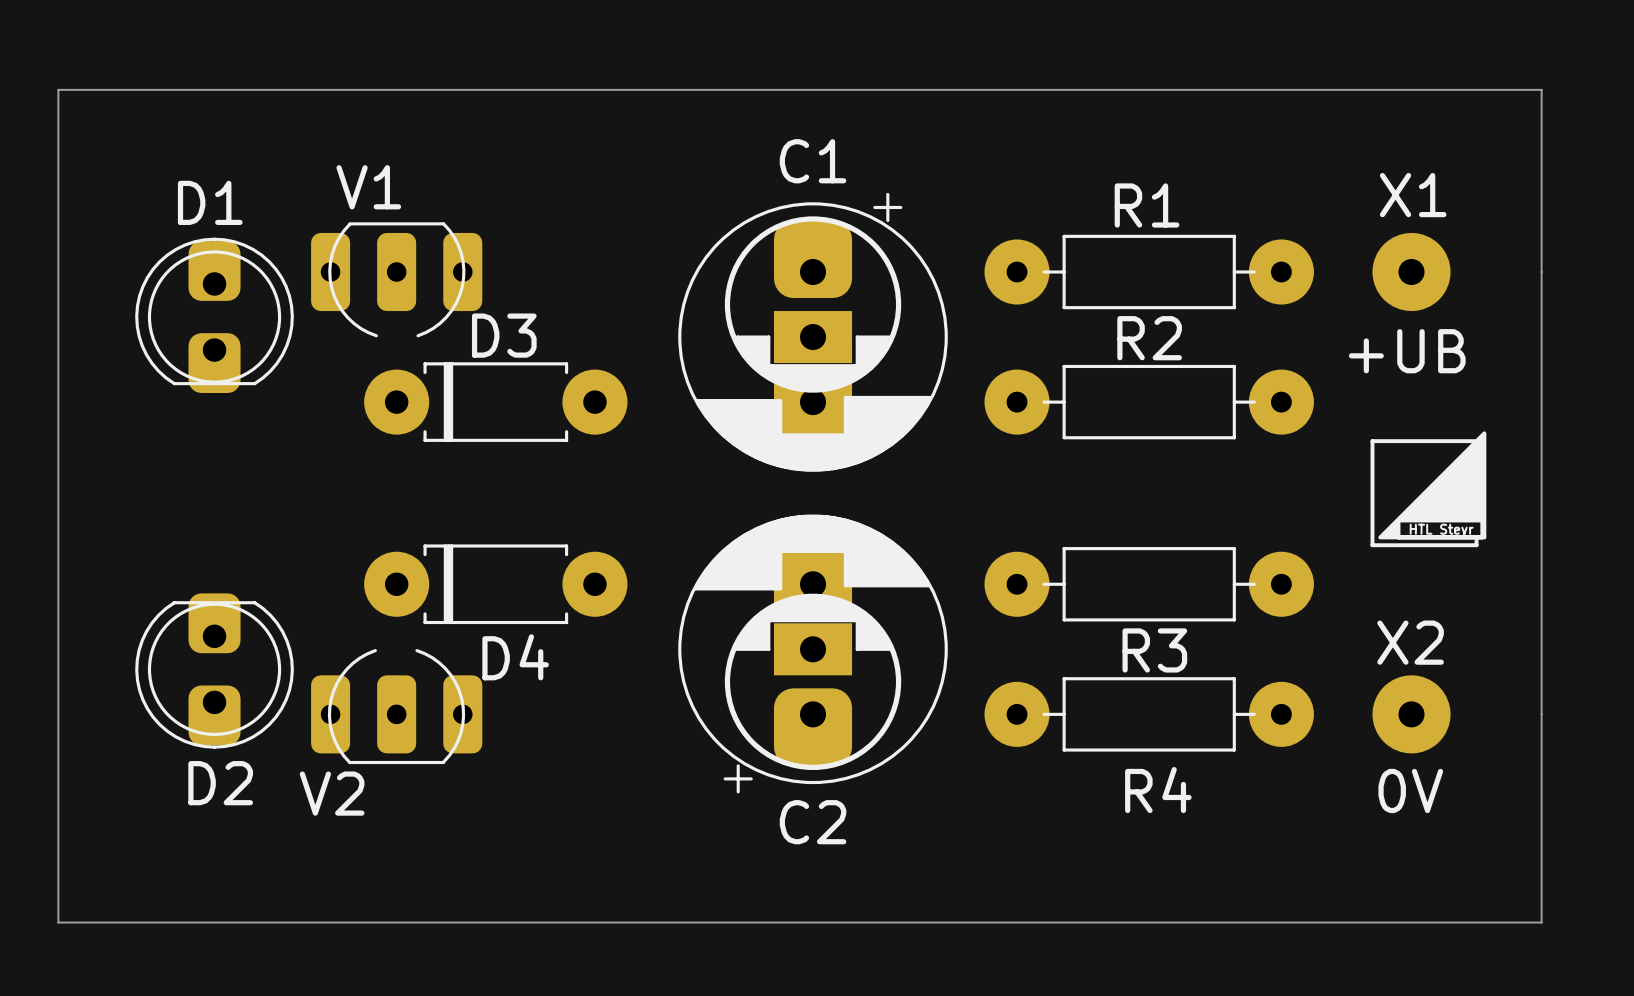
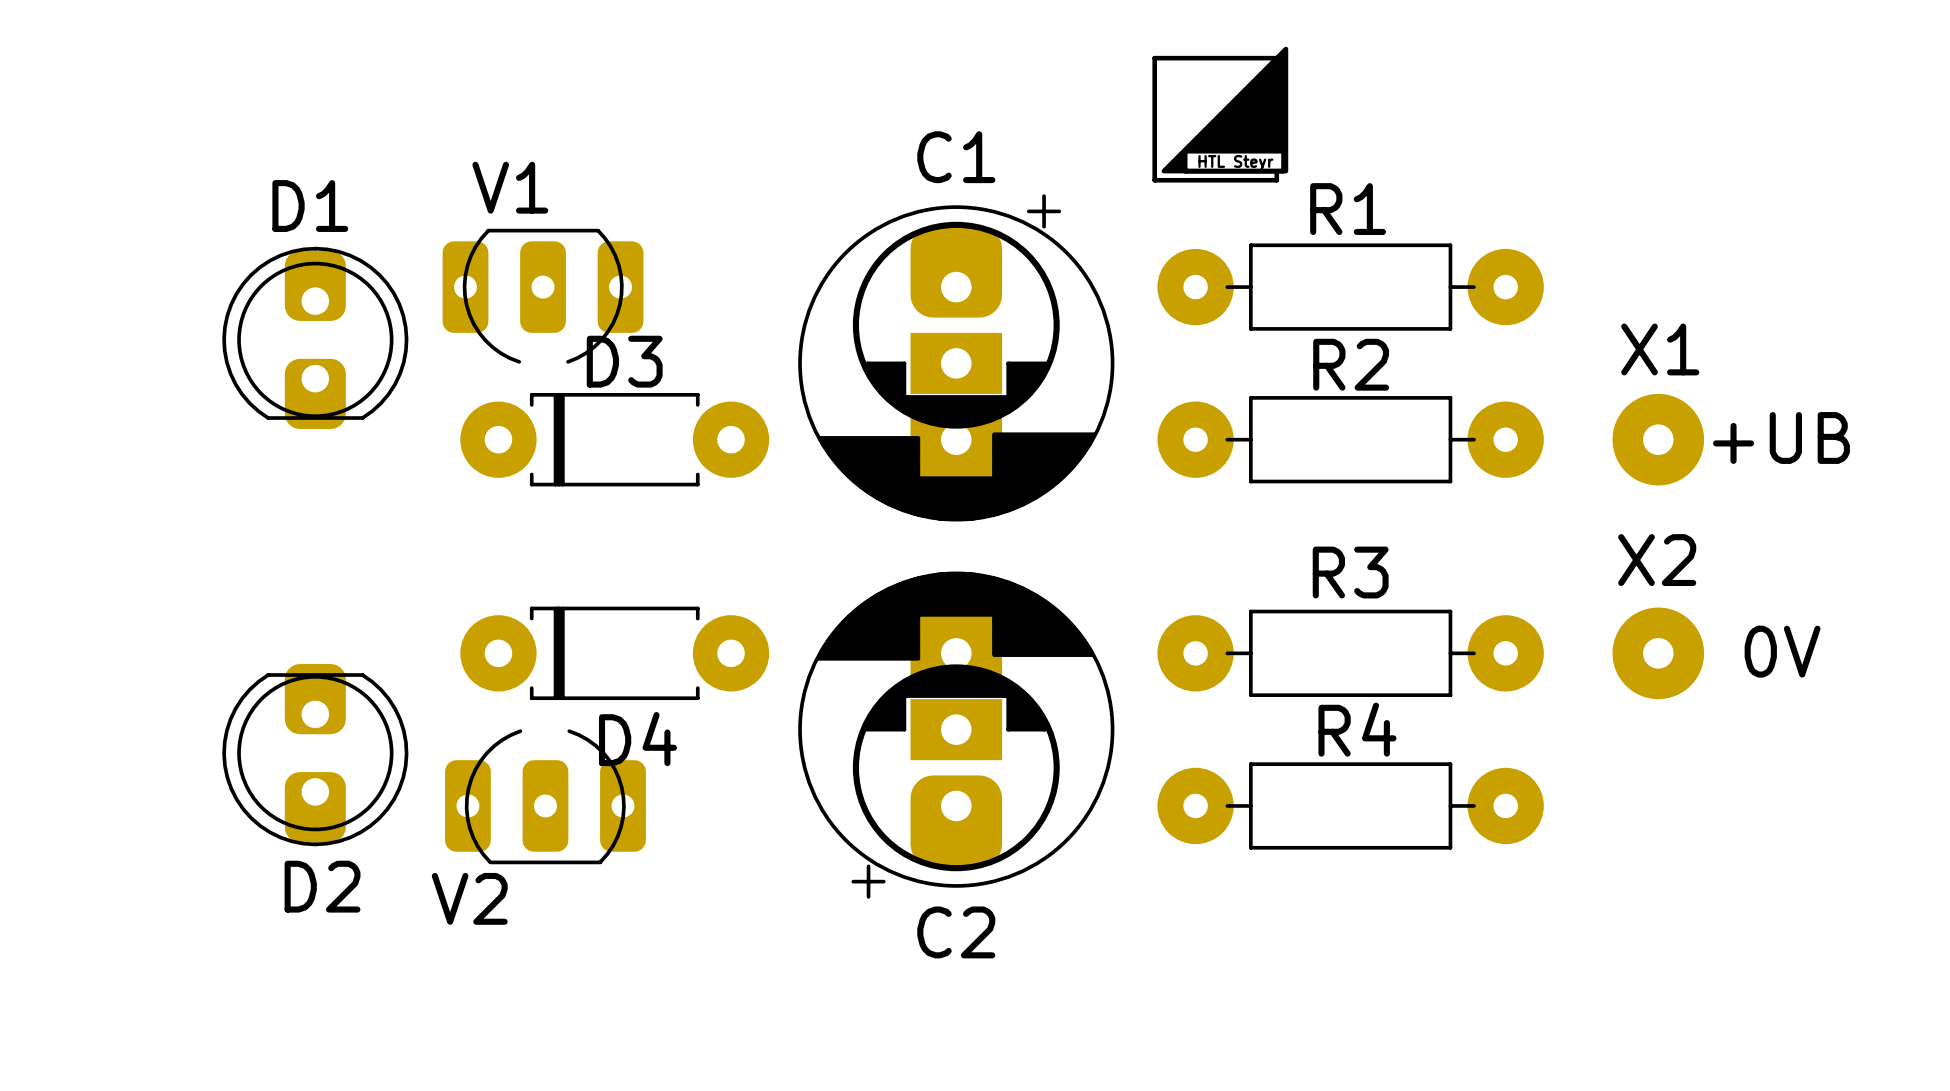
board edge: (58, 89) (58, 922) (1541, 922) (1541, 89) (58, 89) -> none
X1 position: (1411, 272) -> (1658, 439)
V1 position: (396, 279) -> (543, 296)
D1 position: (214, 315) -> (315, 337)
X1 value position: +UB (1407, 351) -> +UB (1781, 437)
D3 position: (495, 402) -> (614, 439)
drawing position: (1428, 489) -> (1220, 114)
D4 position: (495, 584) -> (614, 653)
X2 name position: X2 (1410, 642) -> X2 (1657, 560)
R3 name position: R3 (1154, 650) -> R3 (1350, 572)
D2 position: (214, 671) -> (315, 755)
V2 position: (396, 706) -> (545, 796)
X2 position: (1411, 714) -> (1658, 653)
R4 name position: R4 (1158, 790) -> R4 (1357, 729)
X2 value position: 0V (1410, 790) -> 0V (1782, 651)

